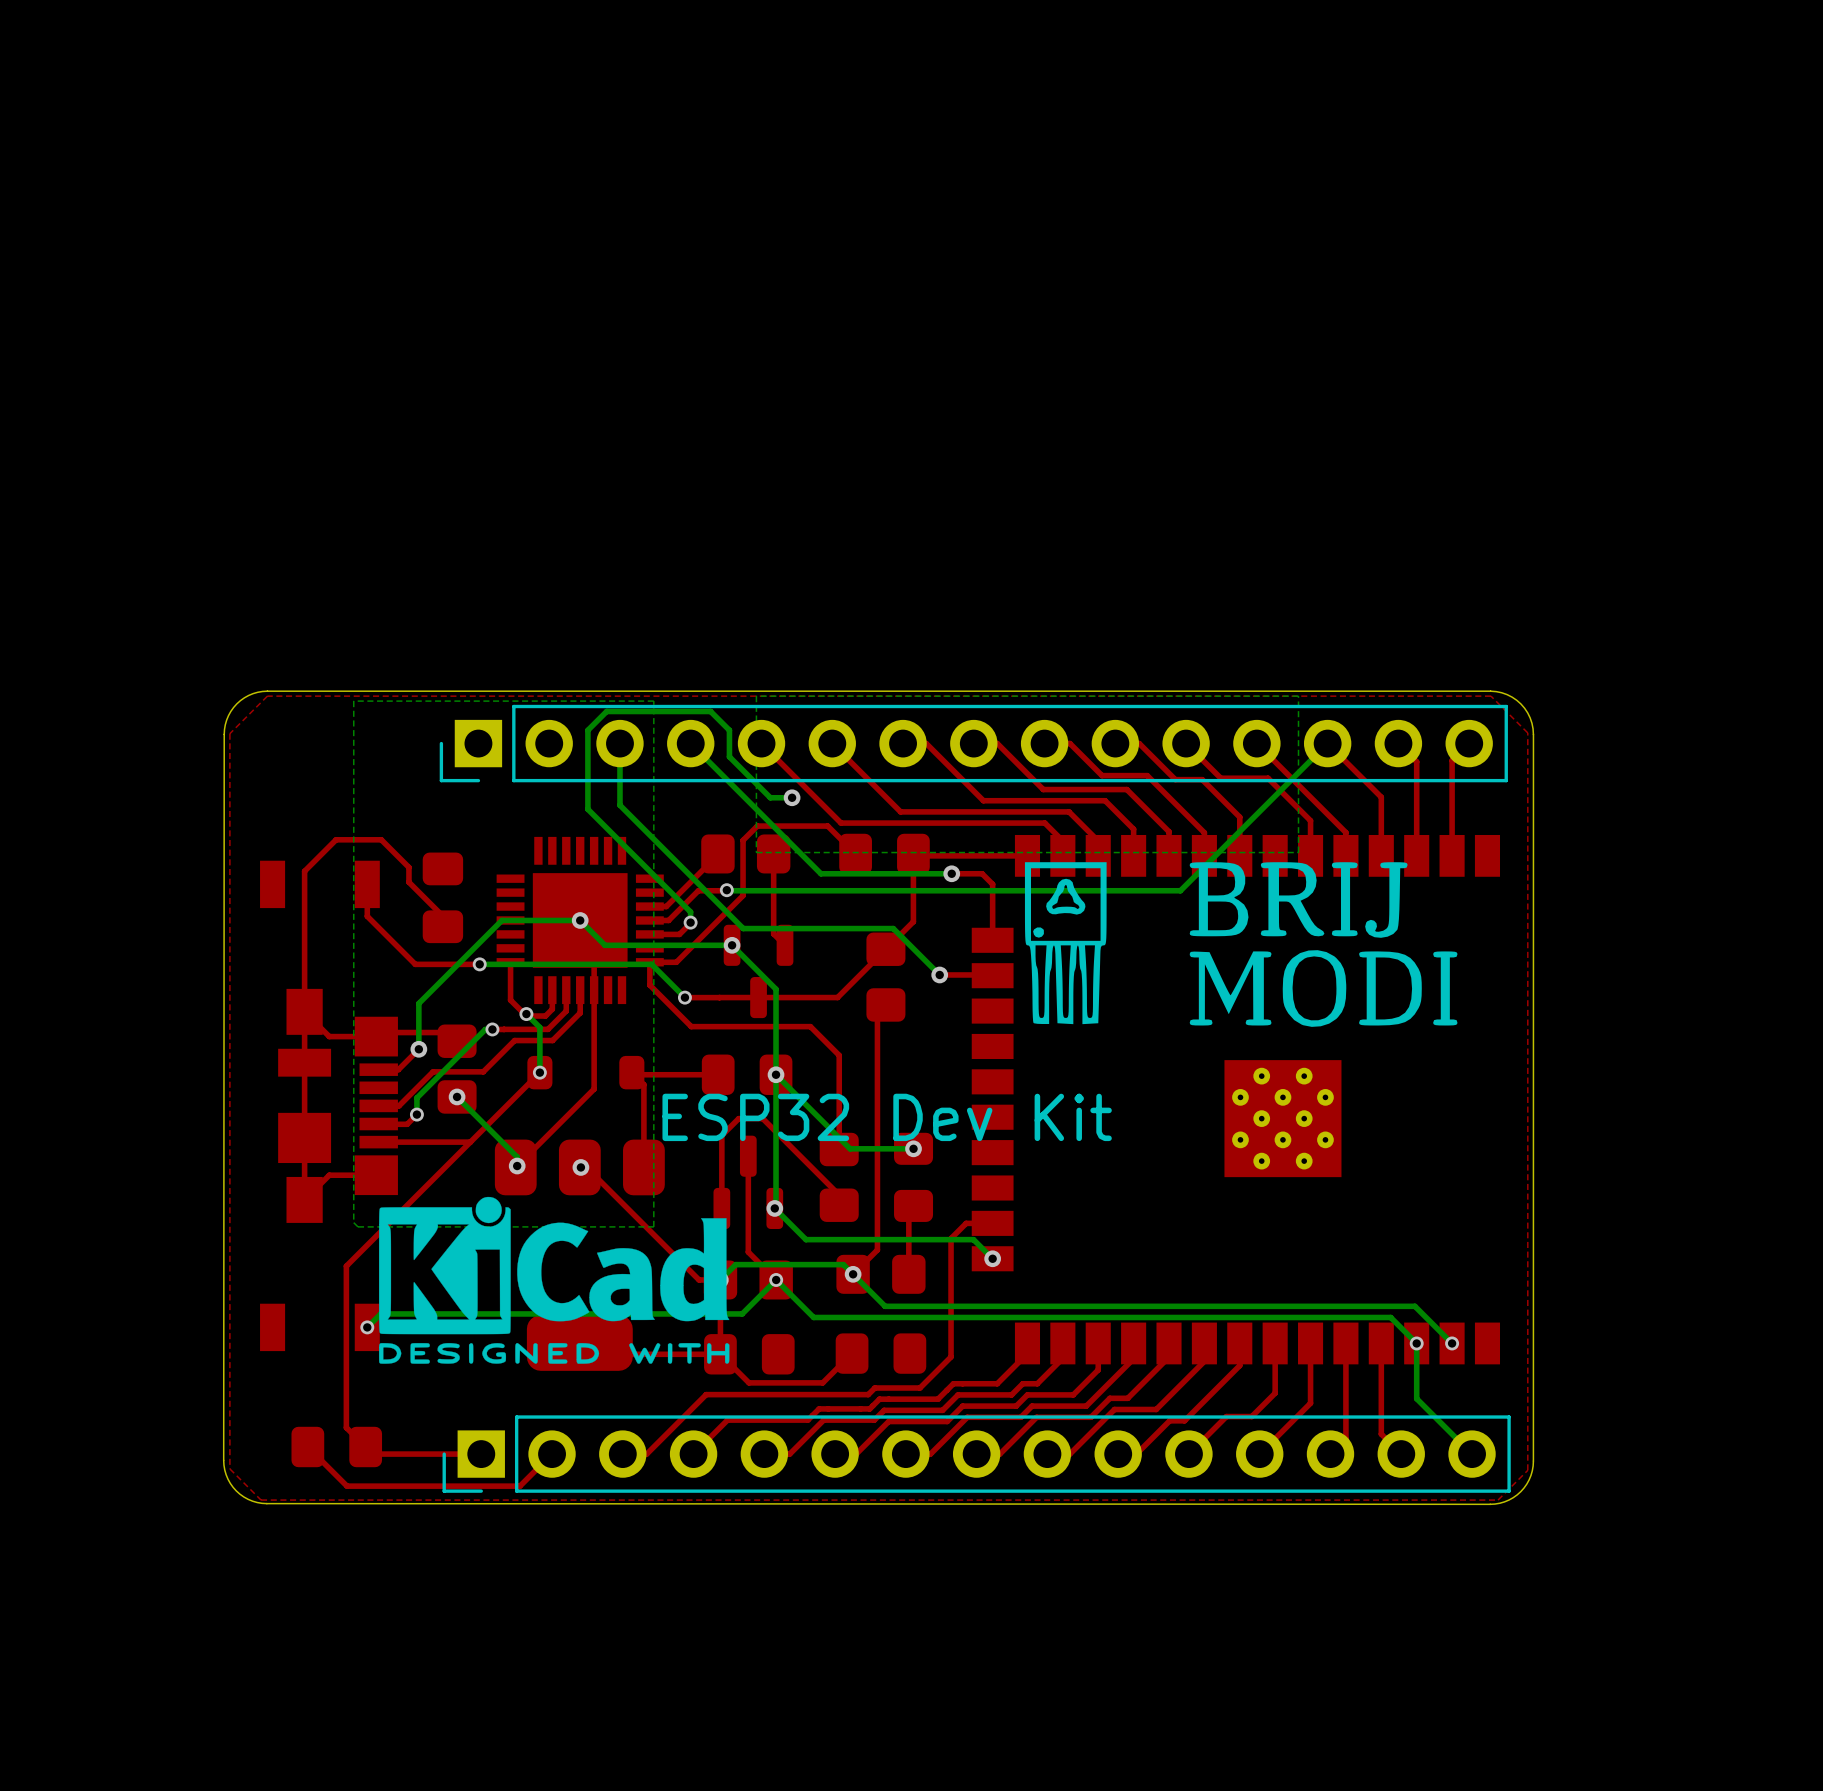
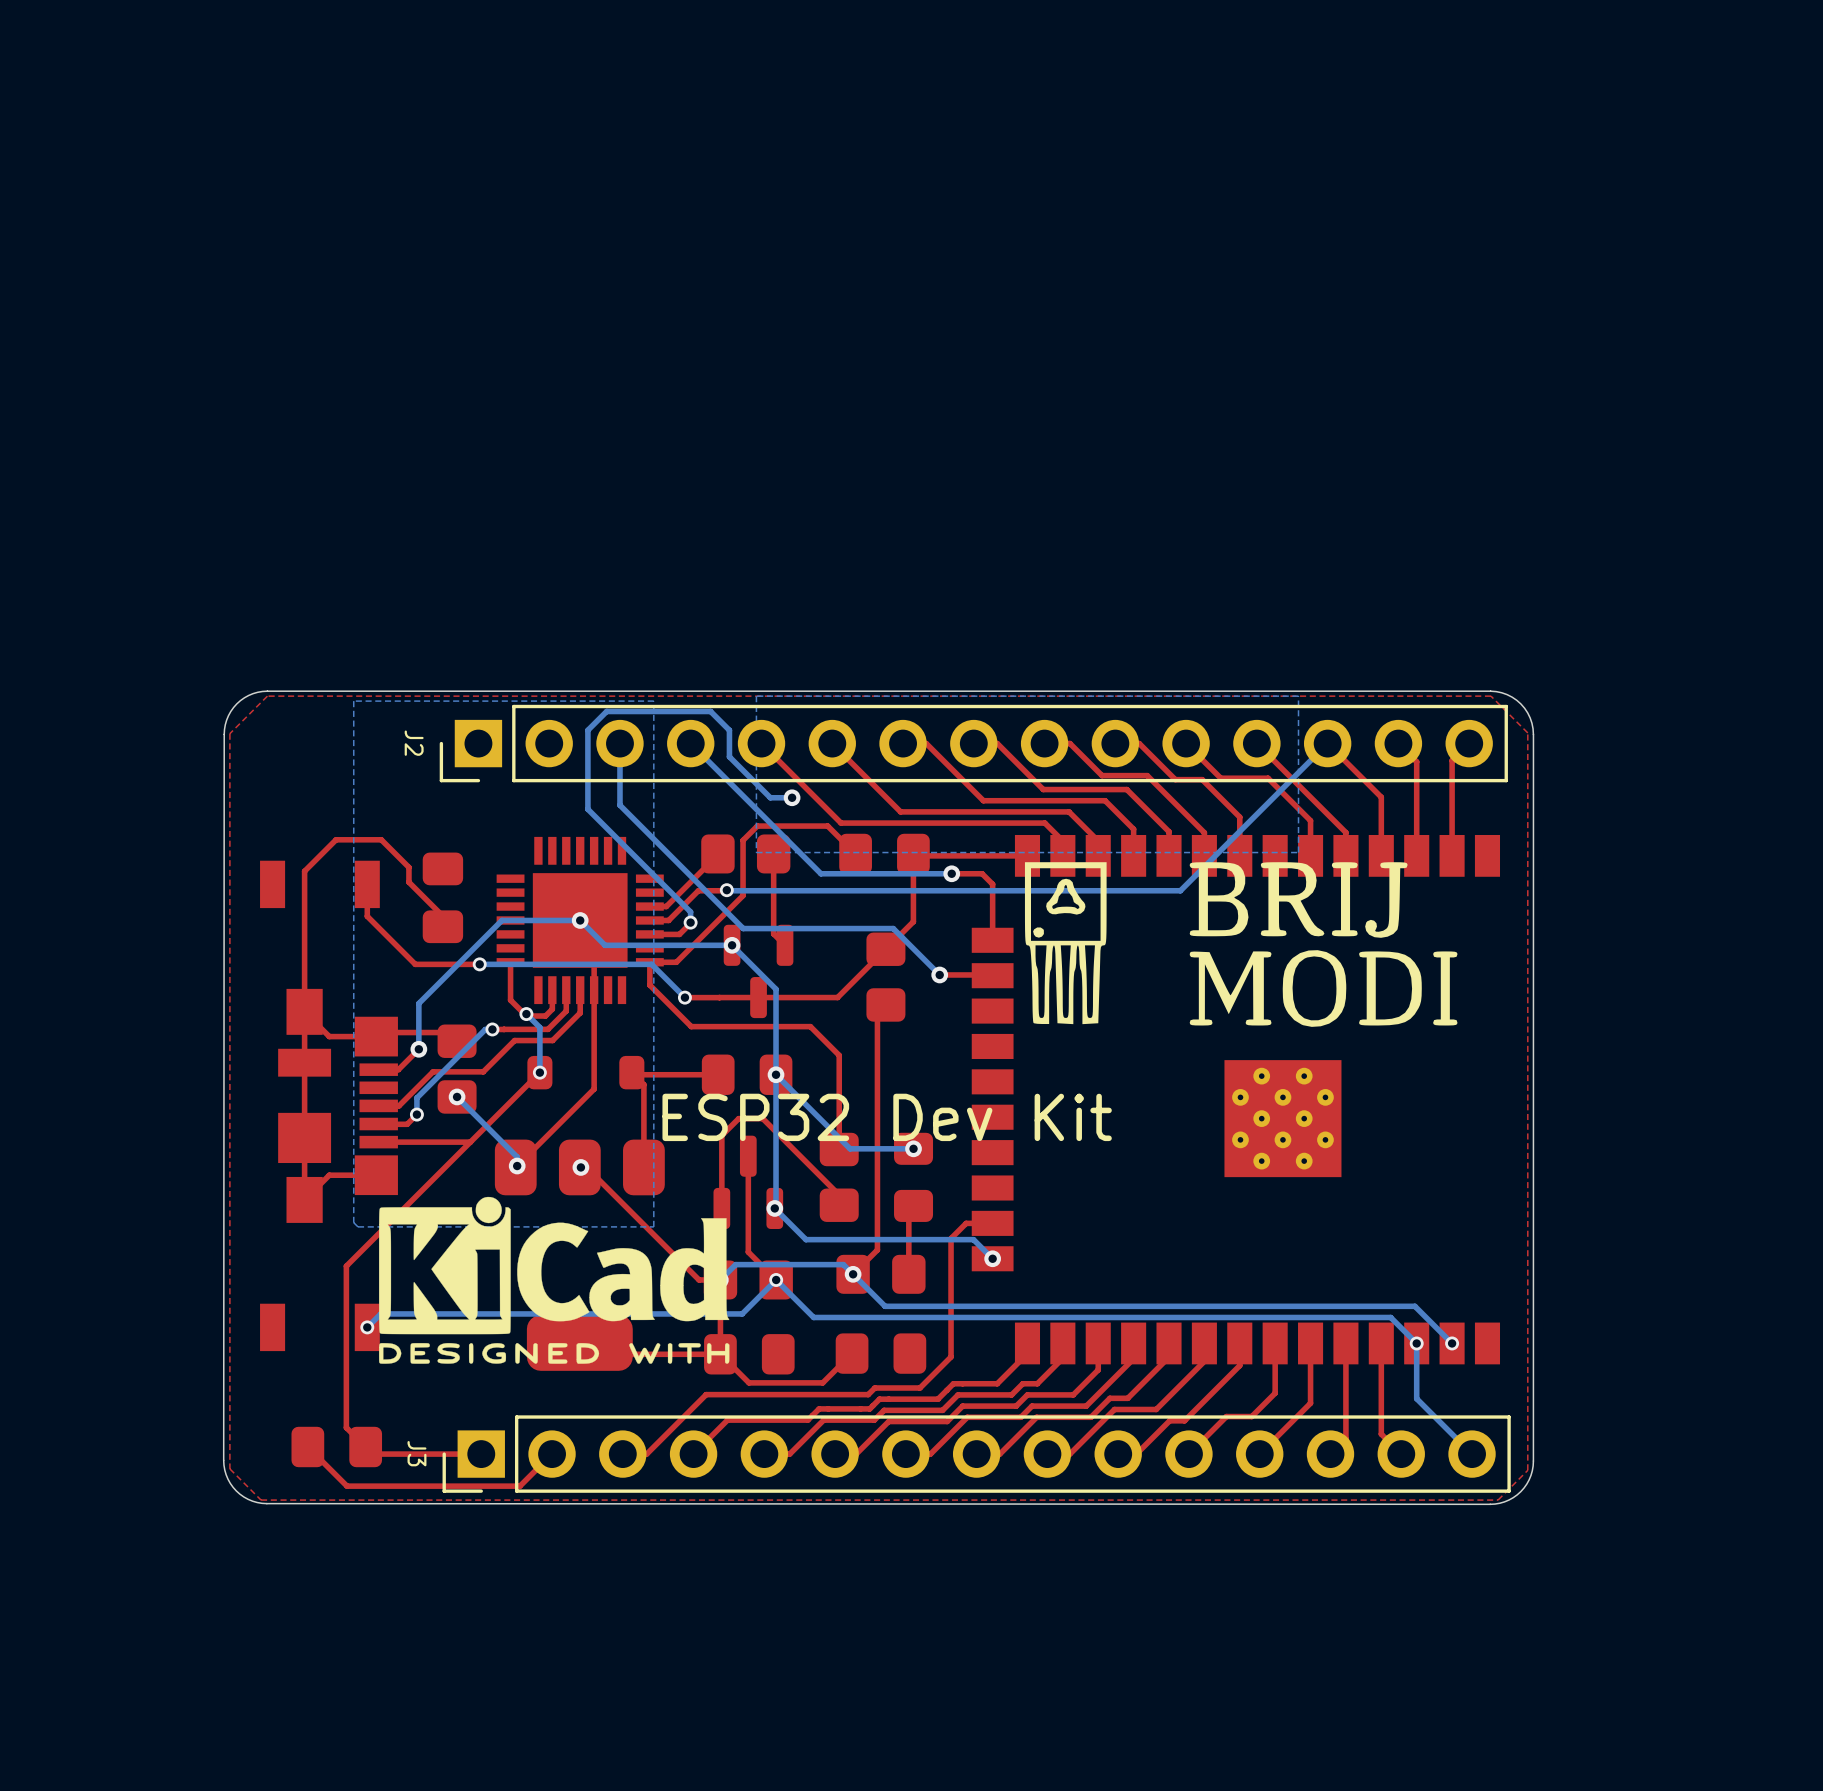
J2 name: none -> J2 (414, 743)
J3 name: none -> J3 (416, 1453)

